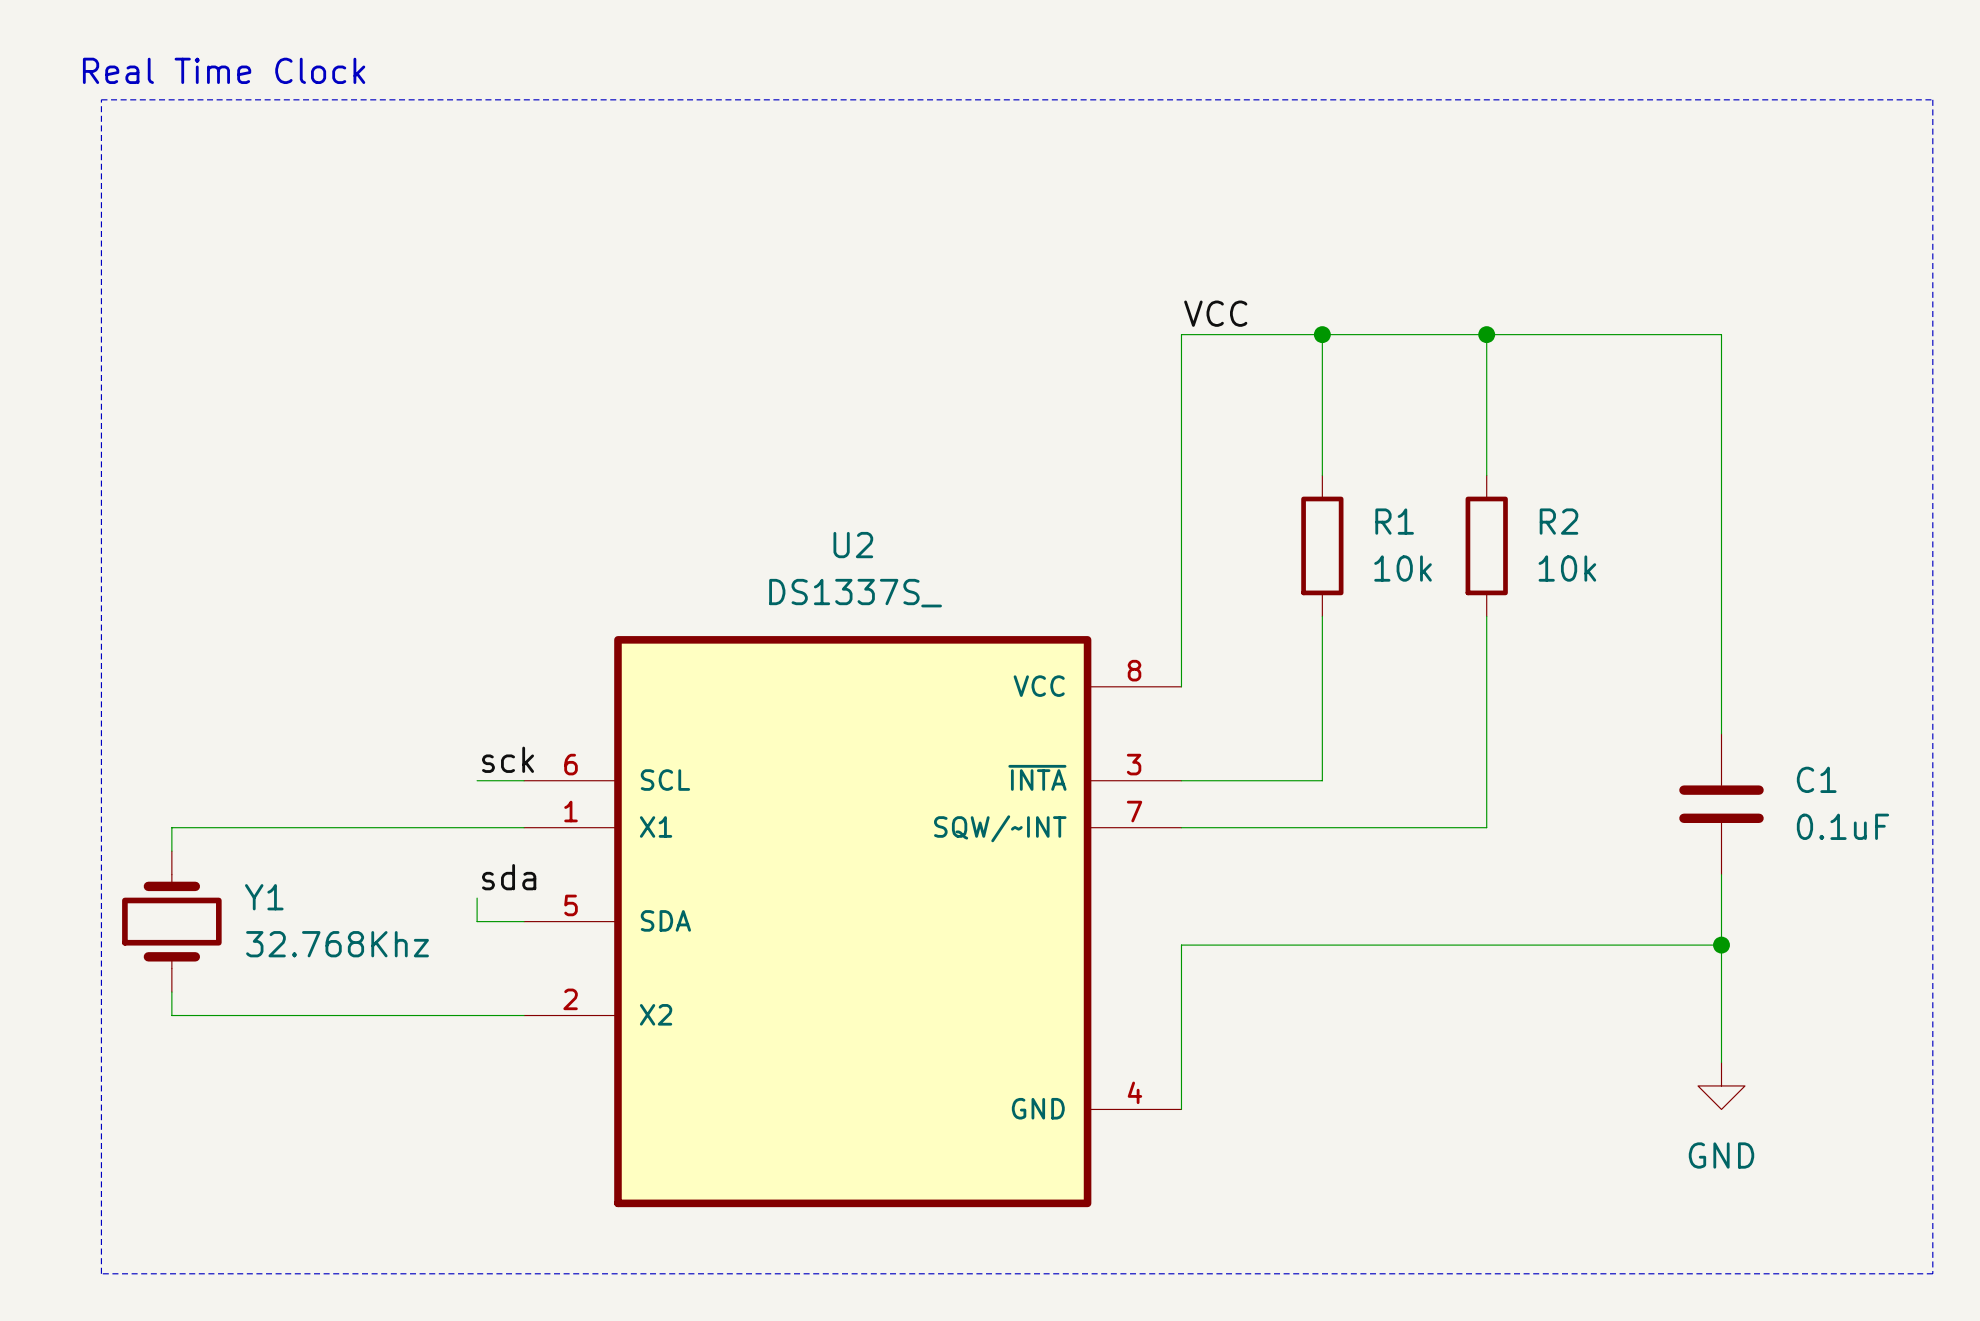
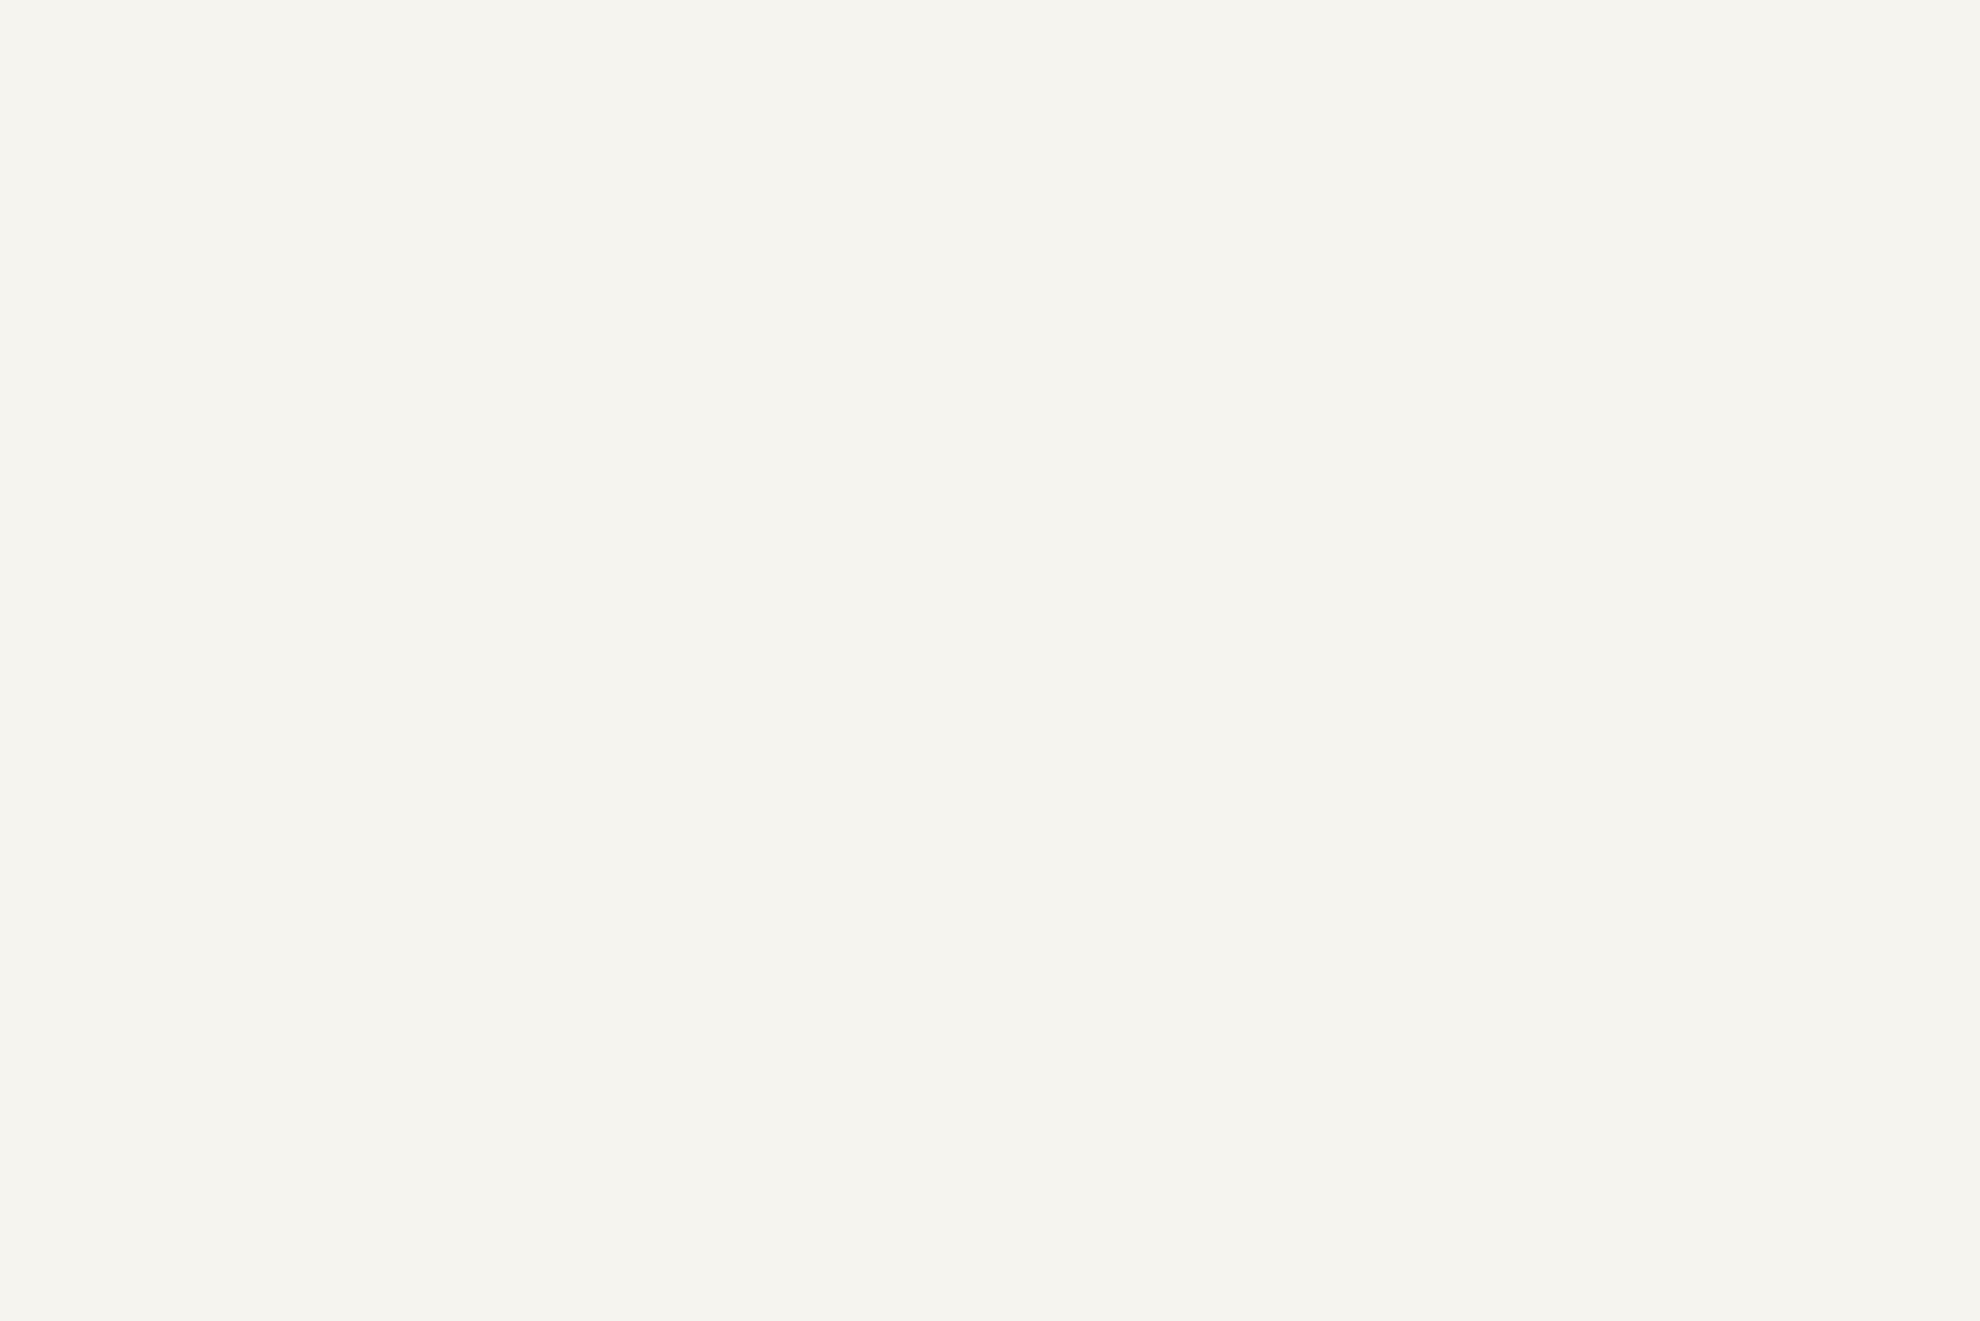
text: Real Time Clock (224, 70) -> none
line: (101, 99) (1932, 99) (1932, 1273) (101, 1273) (101, 99) -> none
label: VCC (1215, 313) -> none
wire: (1322, 334) (1322, 475) -> none
junction: (1322, 334) -> none
wire: (1486, 334) (1486, 475) -> none
junction: (1486, 334) -> none
R1: 10k (1322, 545) -> none
R2: 10k (1486, 545) -> none
wire: (1322, 616) (1322, 780) (1181, 780) -> none
wire: (1486, 616) (1486, 827) (1181, 827) -> none
wire: (1181, 686) (1181, 334) (1721, 334) (1721, 733) -> none
label: sck (508, 759) -> none
wire: (477, 780) (524, 780) -> none
C1: 0.1uF (1721, 804) -> none
wire: (524, 827) (171, 827) (171, 851) -> none
wire: (1721, 874) (1721, 1062) -> none
label: sda (509, 877) -> none
wire: (477, 898) (477, 921) (524, 921) -> none
Y1: 32.768Khz (171, 921) -> none
U2: DS1337S_ (852, 921) -> none
wire: (1721, 945) (1181, 945) (1181, 1109) -> none
junction: (1721, 945) -> none
wire: (171, 992) (171, 1015) (524, 1015) -> none
power symbol: GND (1721, 1085) -> none

